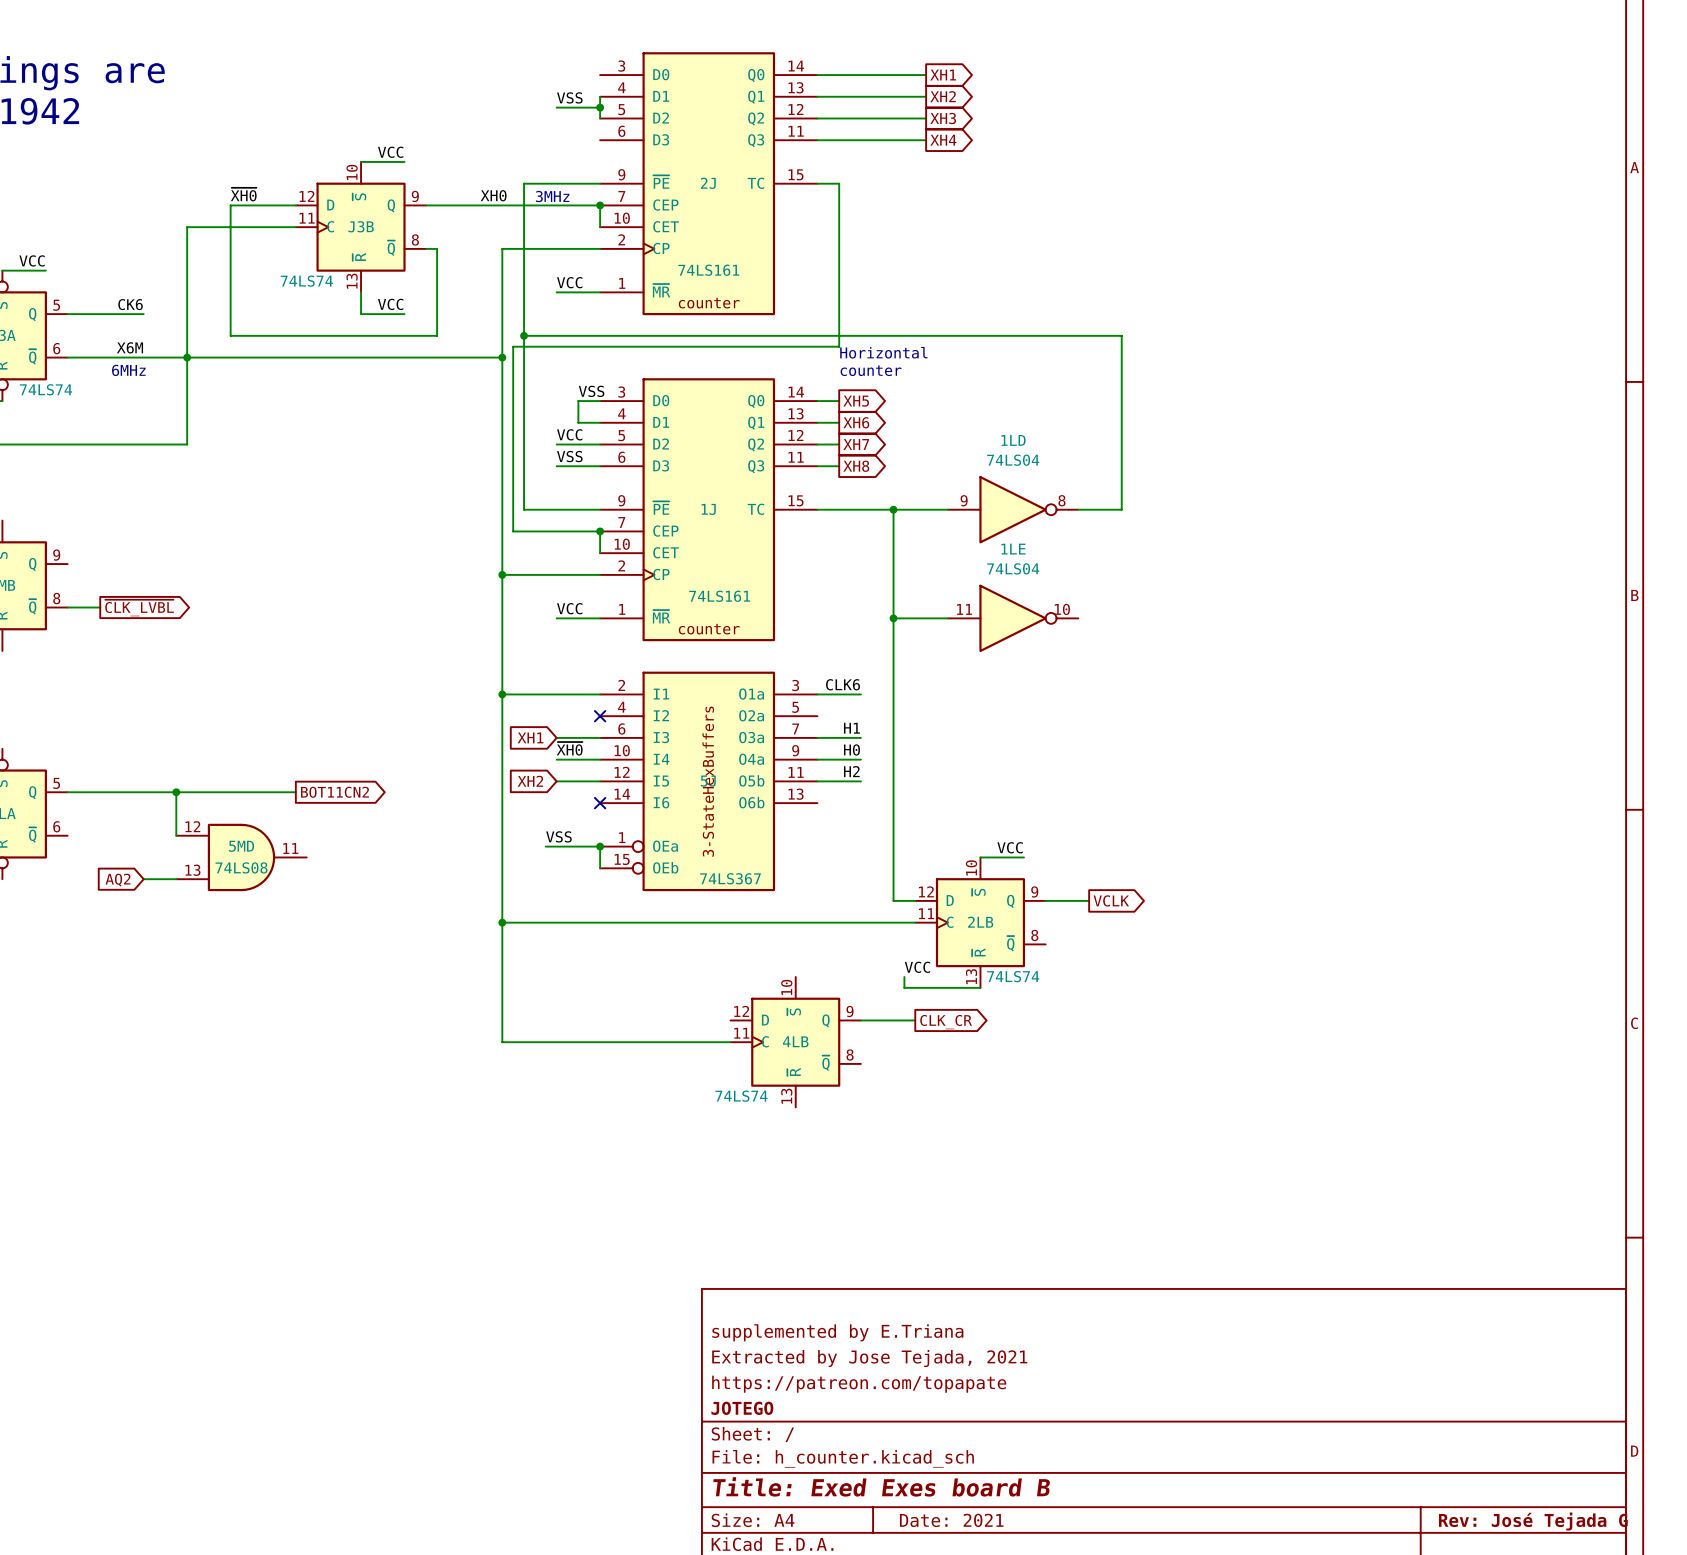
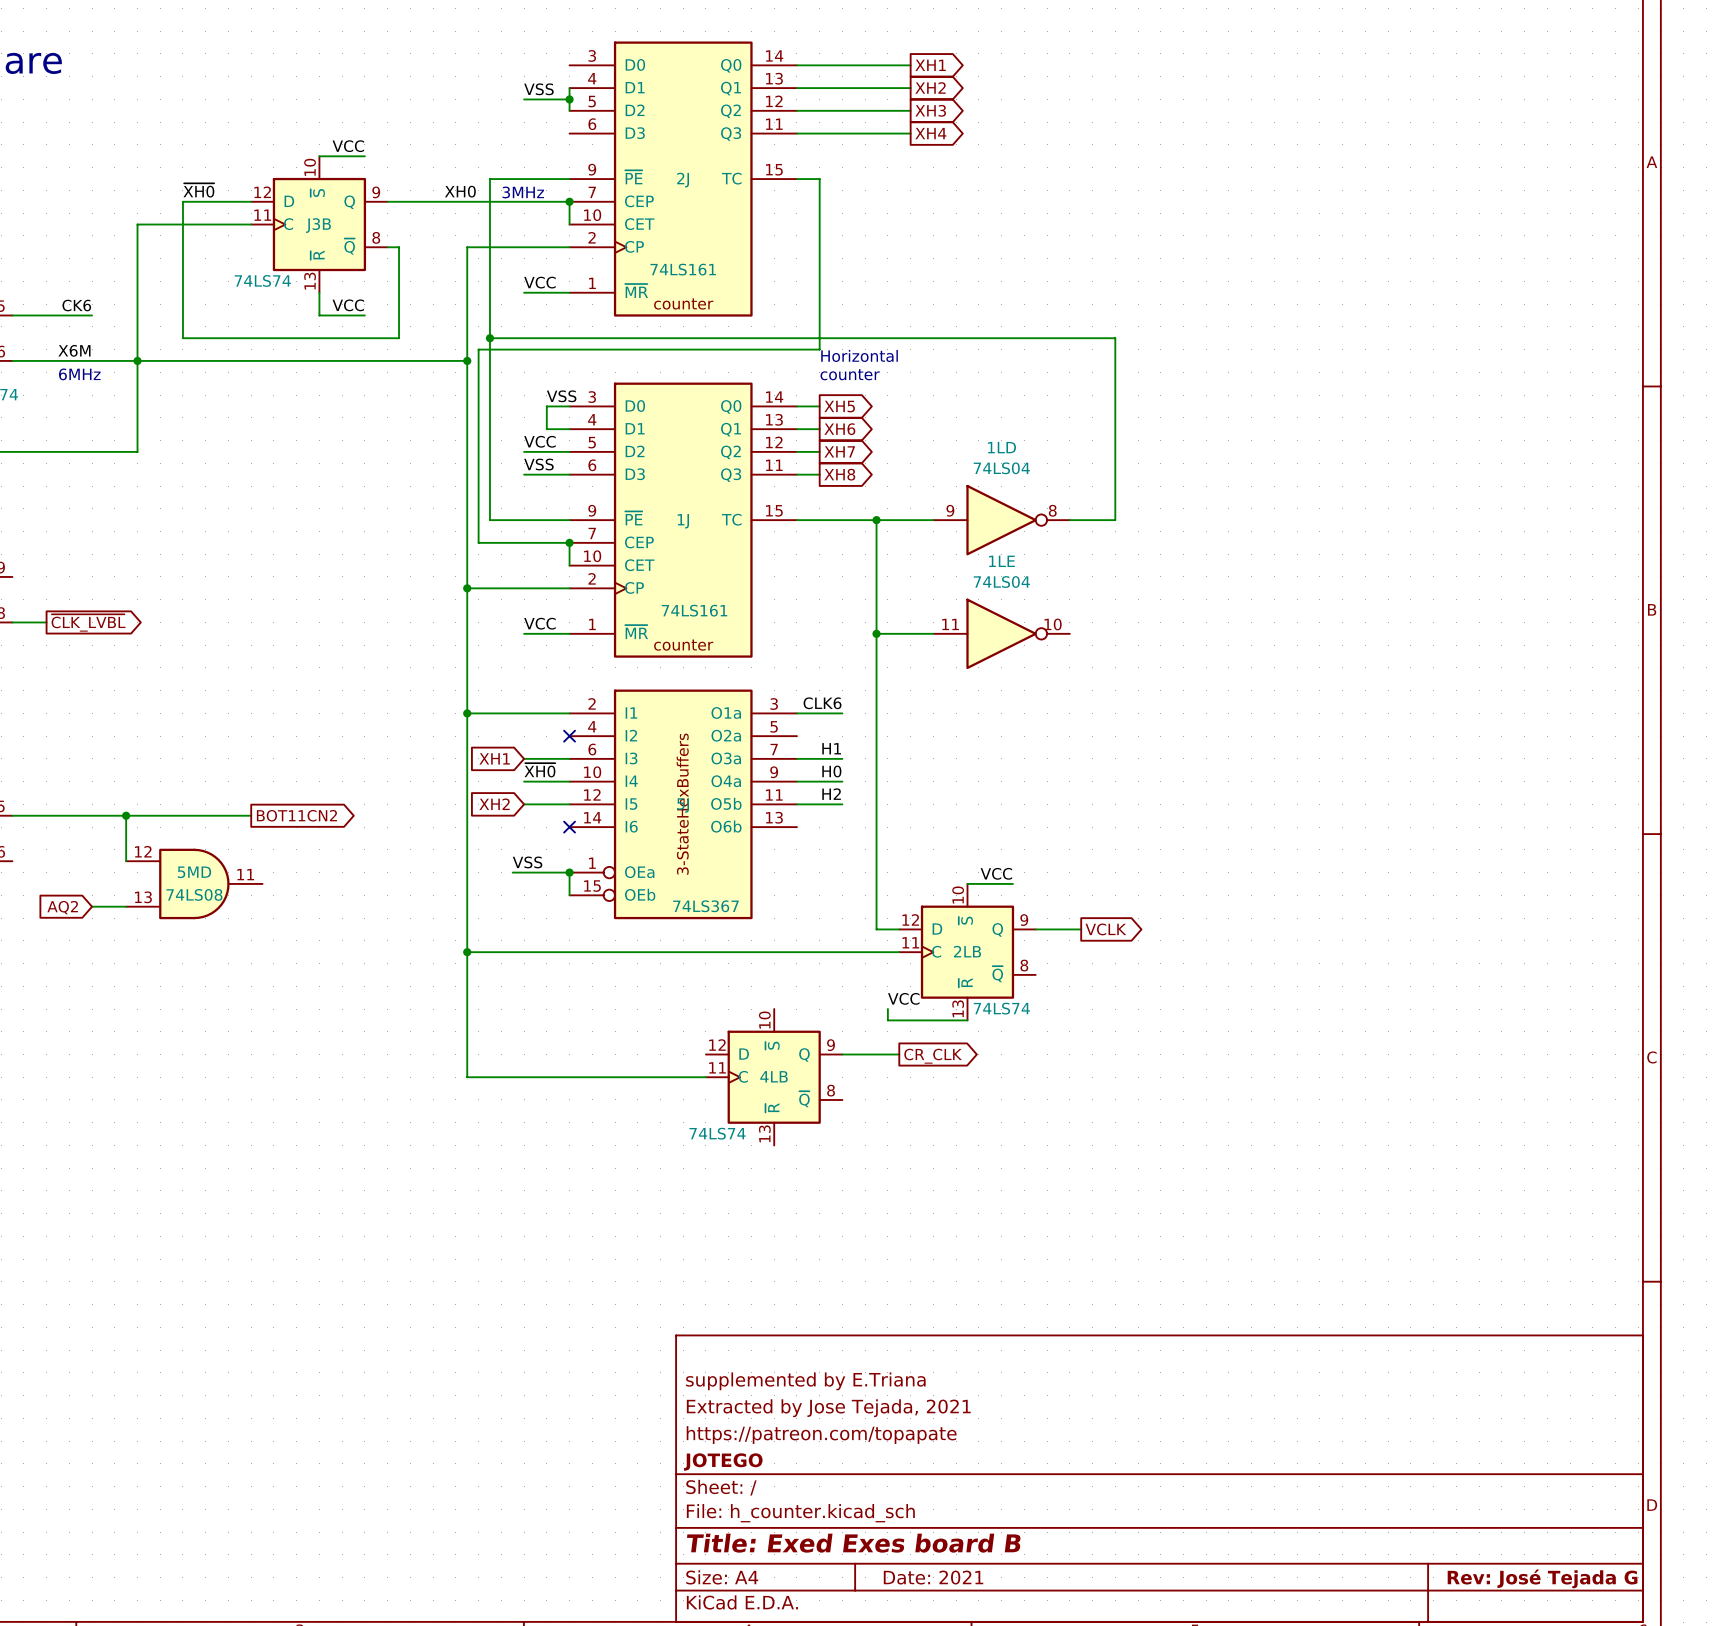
global label: CLK_CR (946, 1022) -> CR_CLK (933, 1056)

